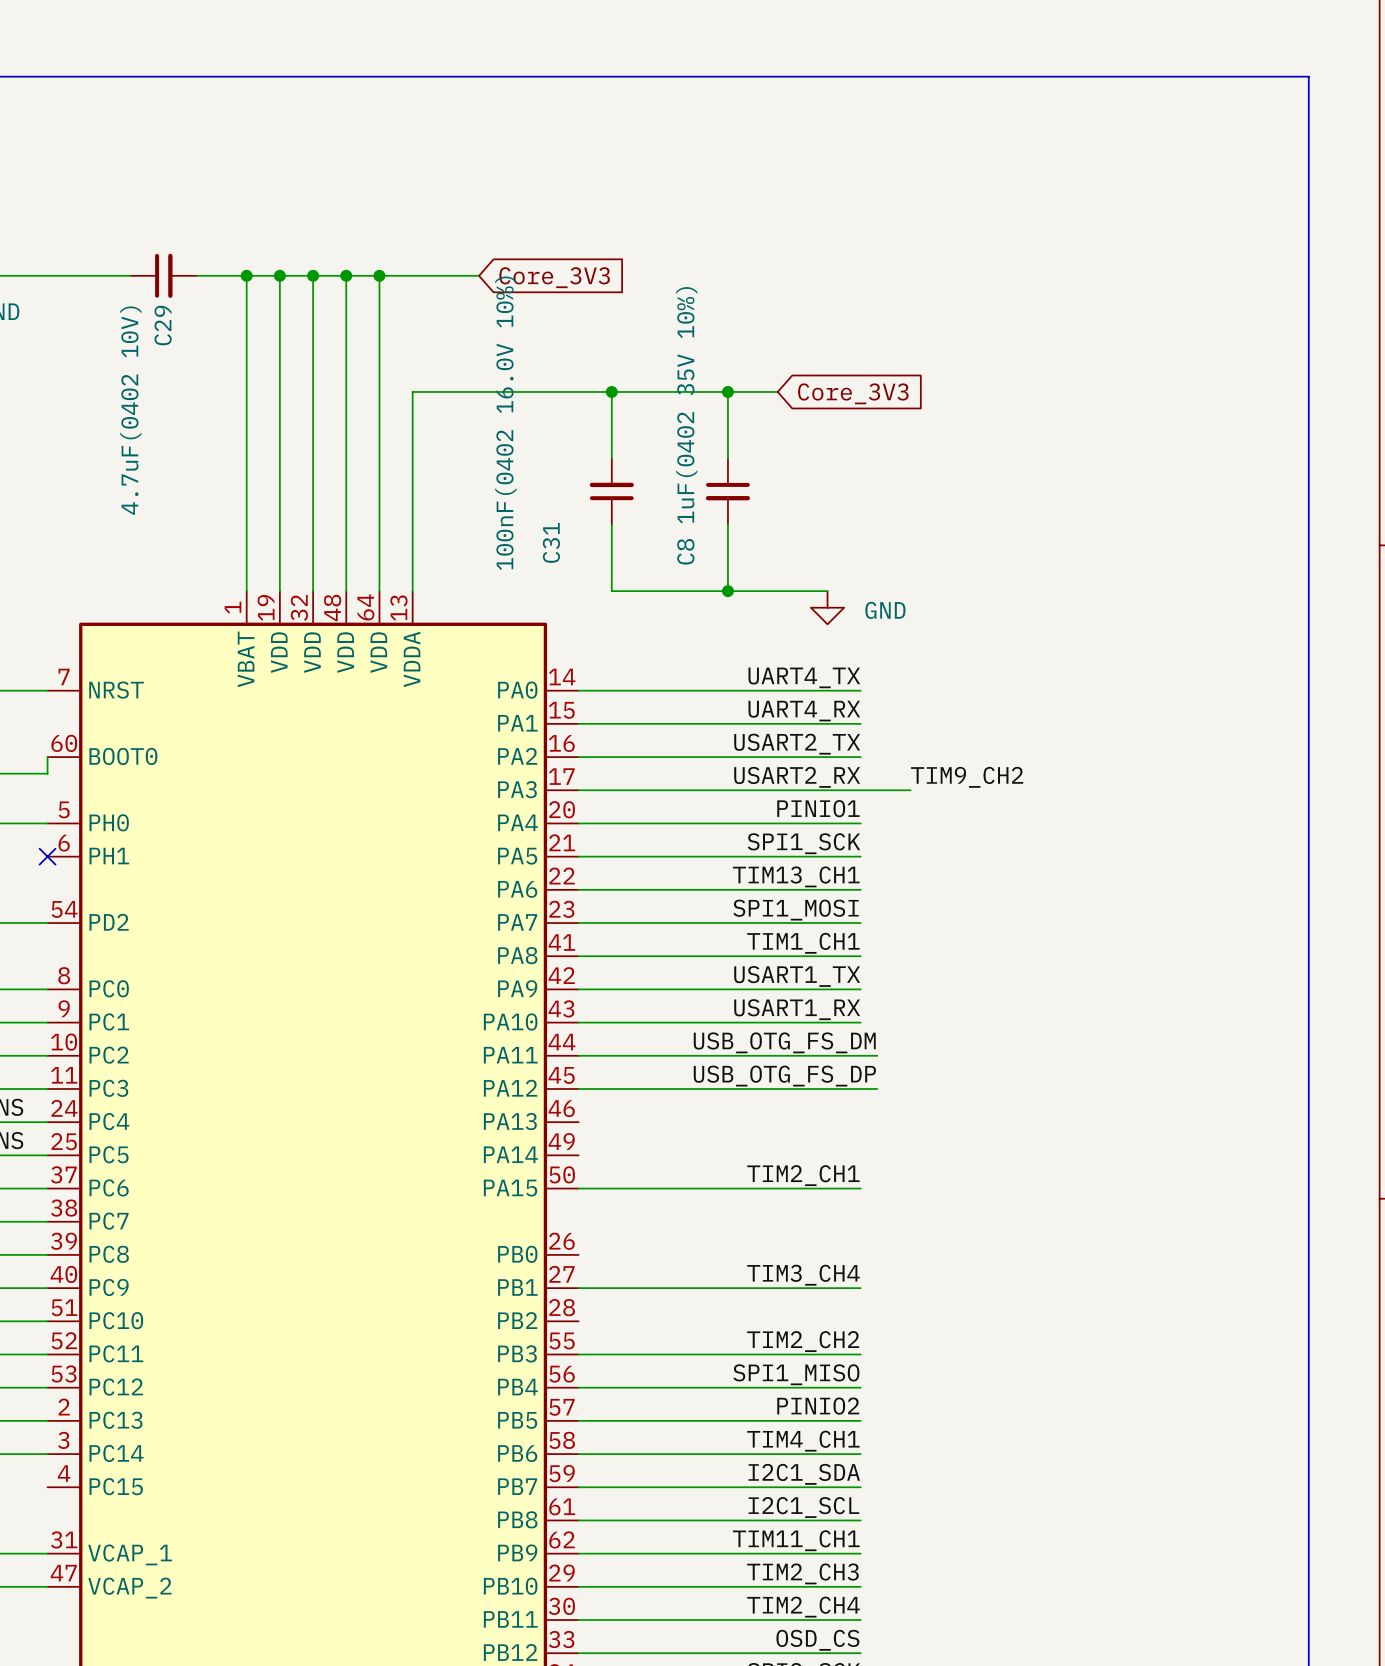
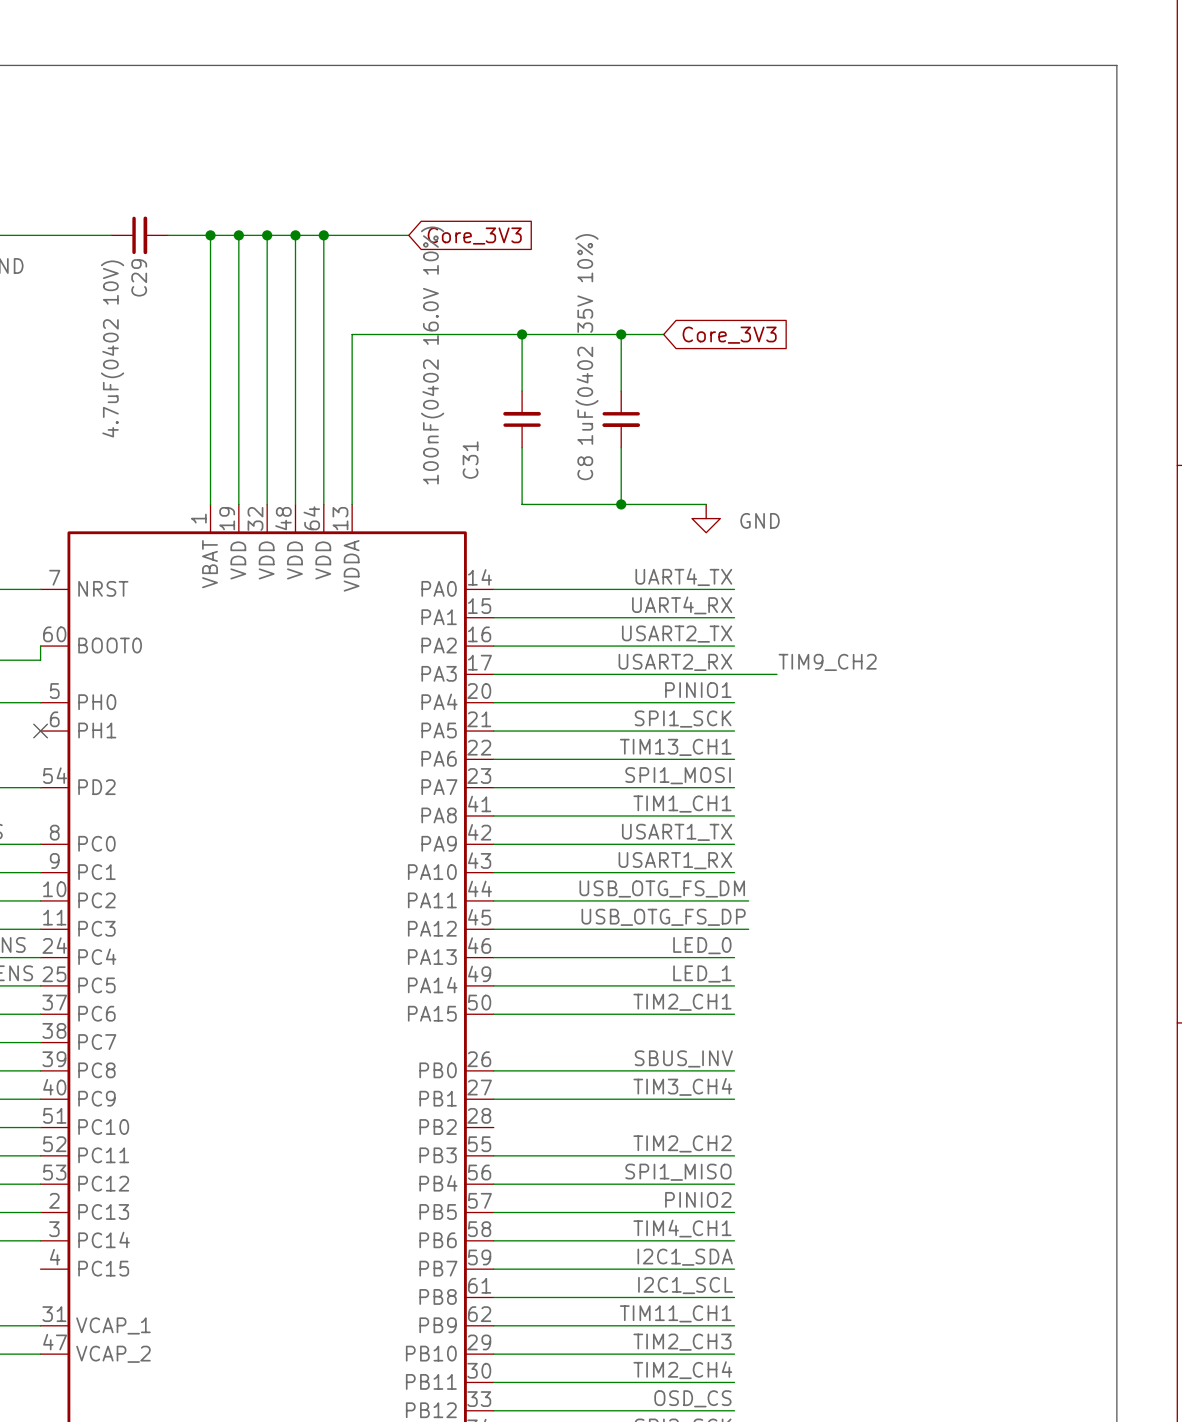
label: none -> LED_0 (702, 945)
wire: none -> (493, 957) (734, 957)
label: none -> LED_1 (702, 973)
wire: none -> (493, 985) (734, 985)
label: none -> SBUS_INV (683, 1058)
wire: none -> (493, 1070) (734, 1070)

